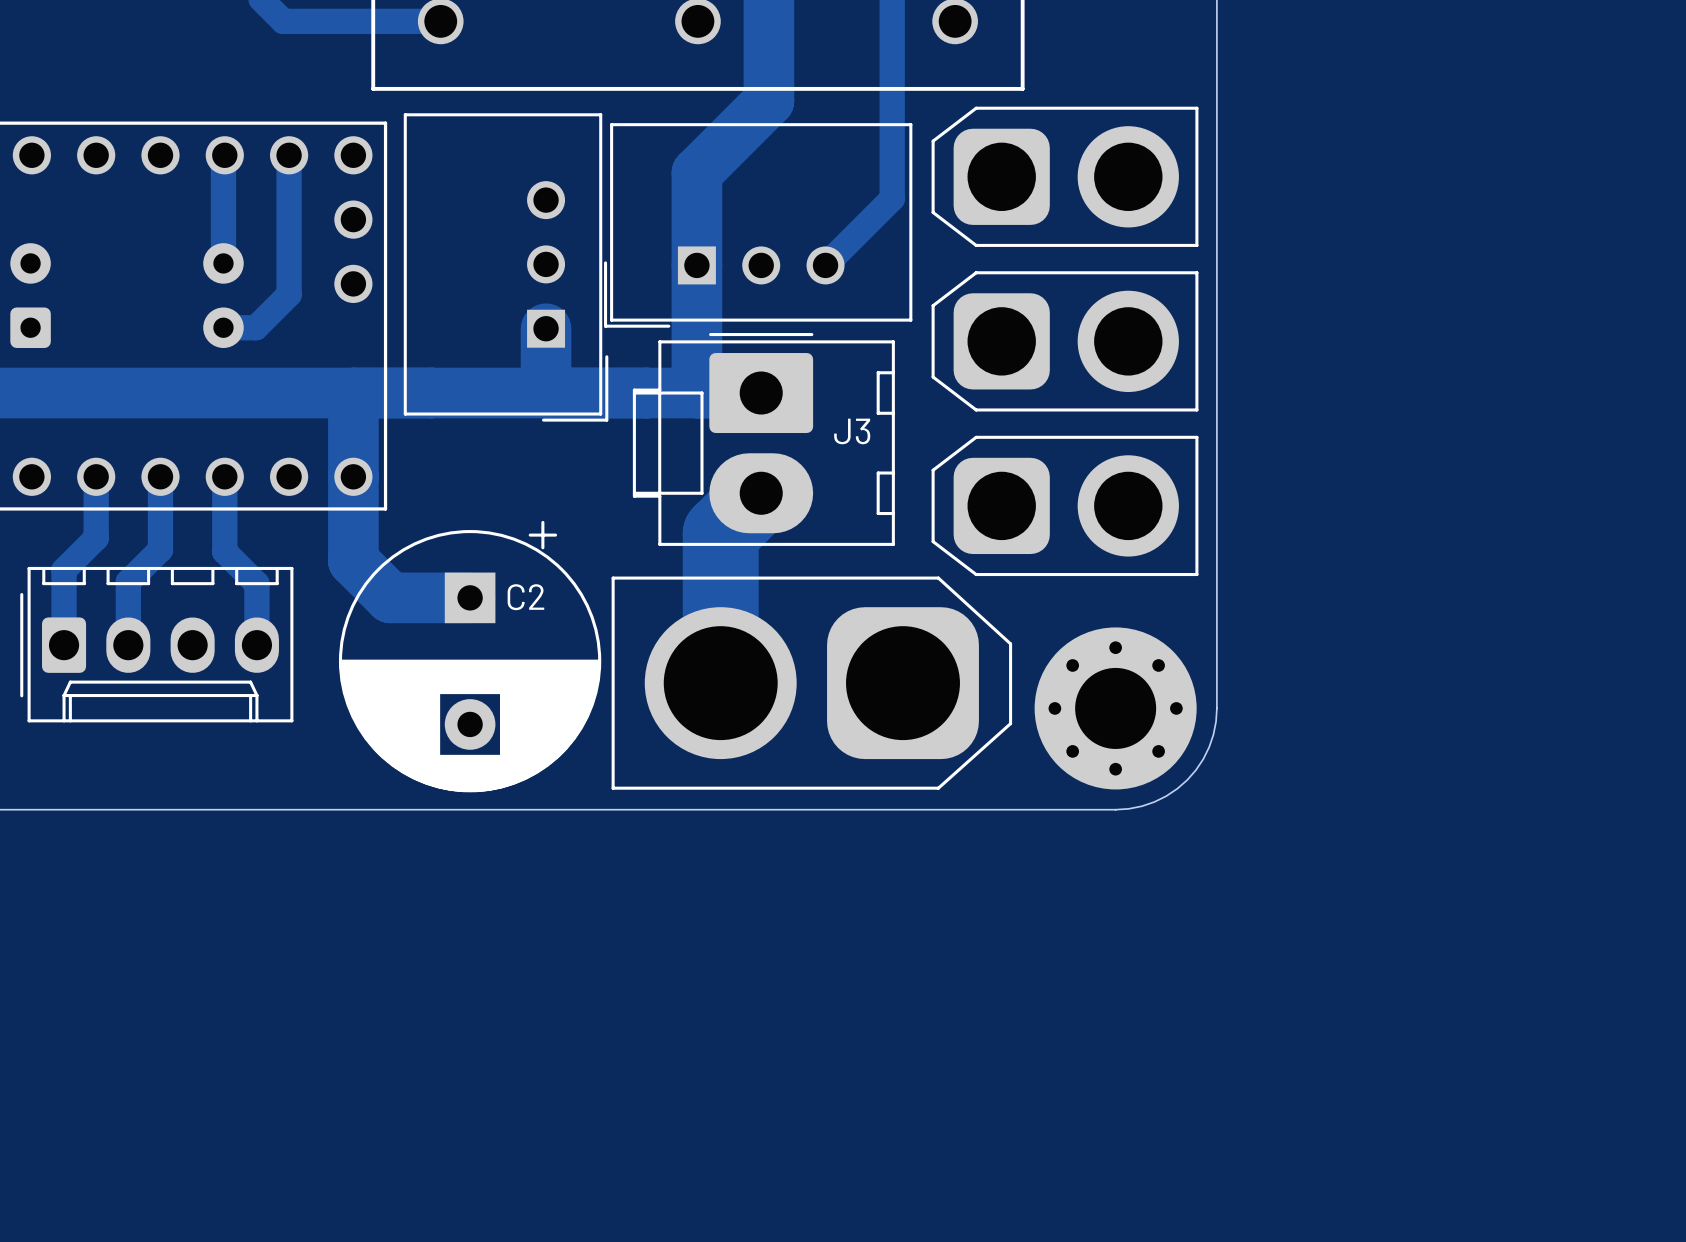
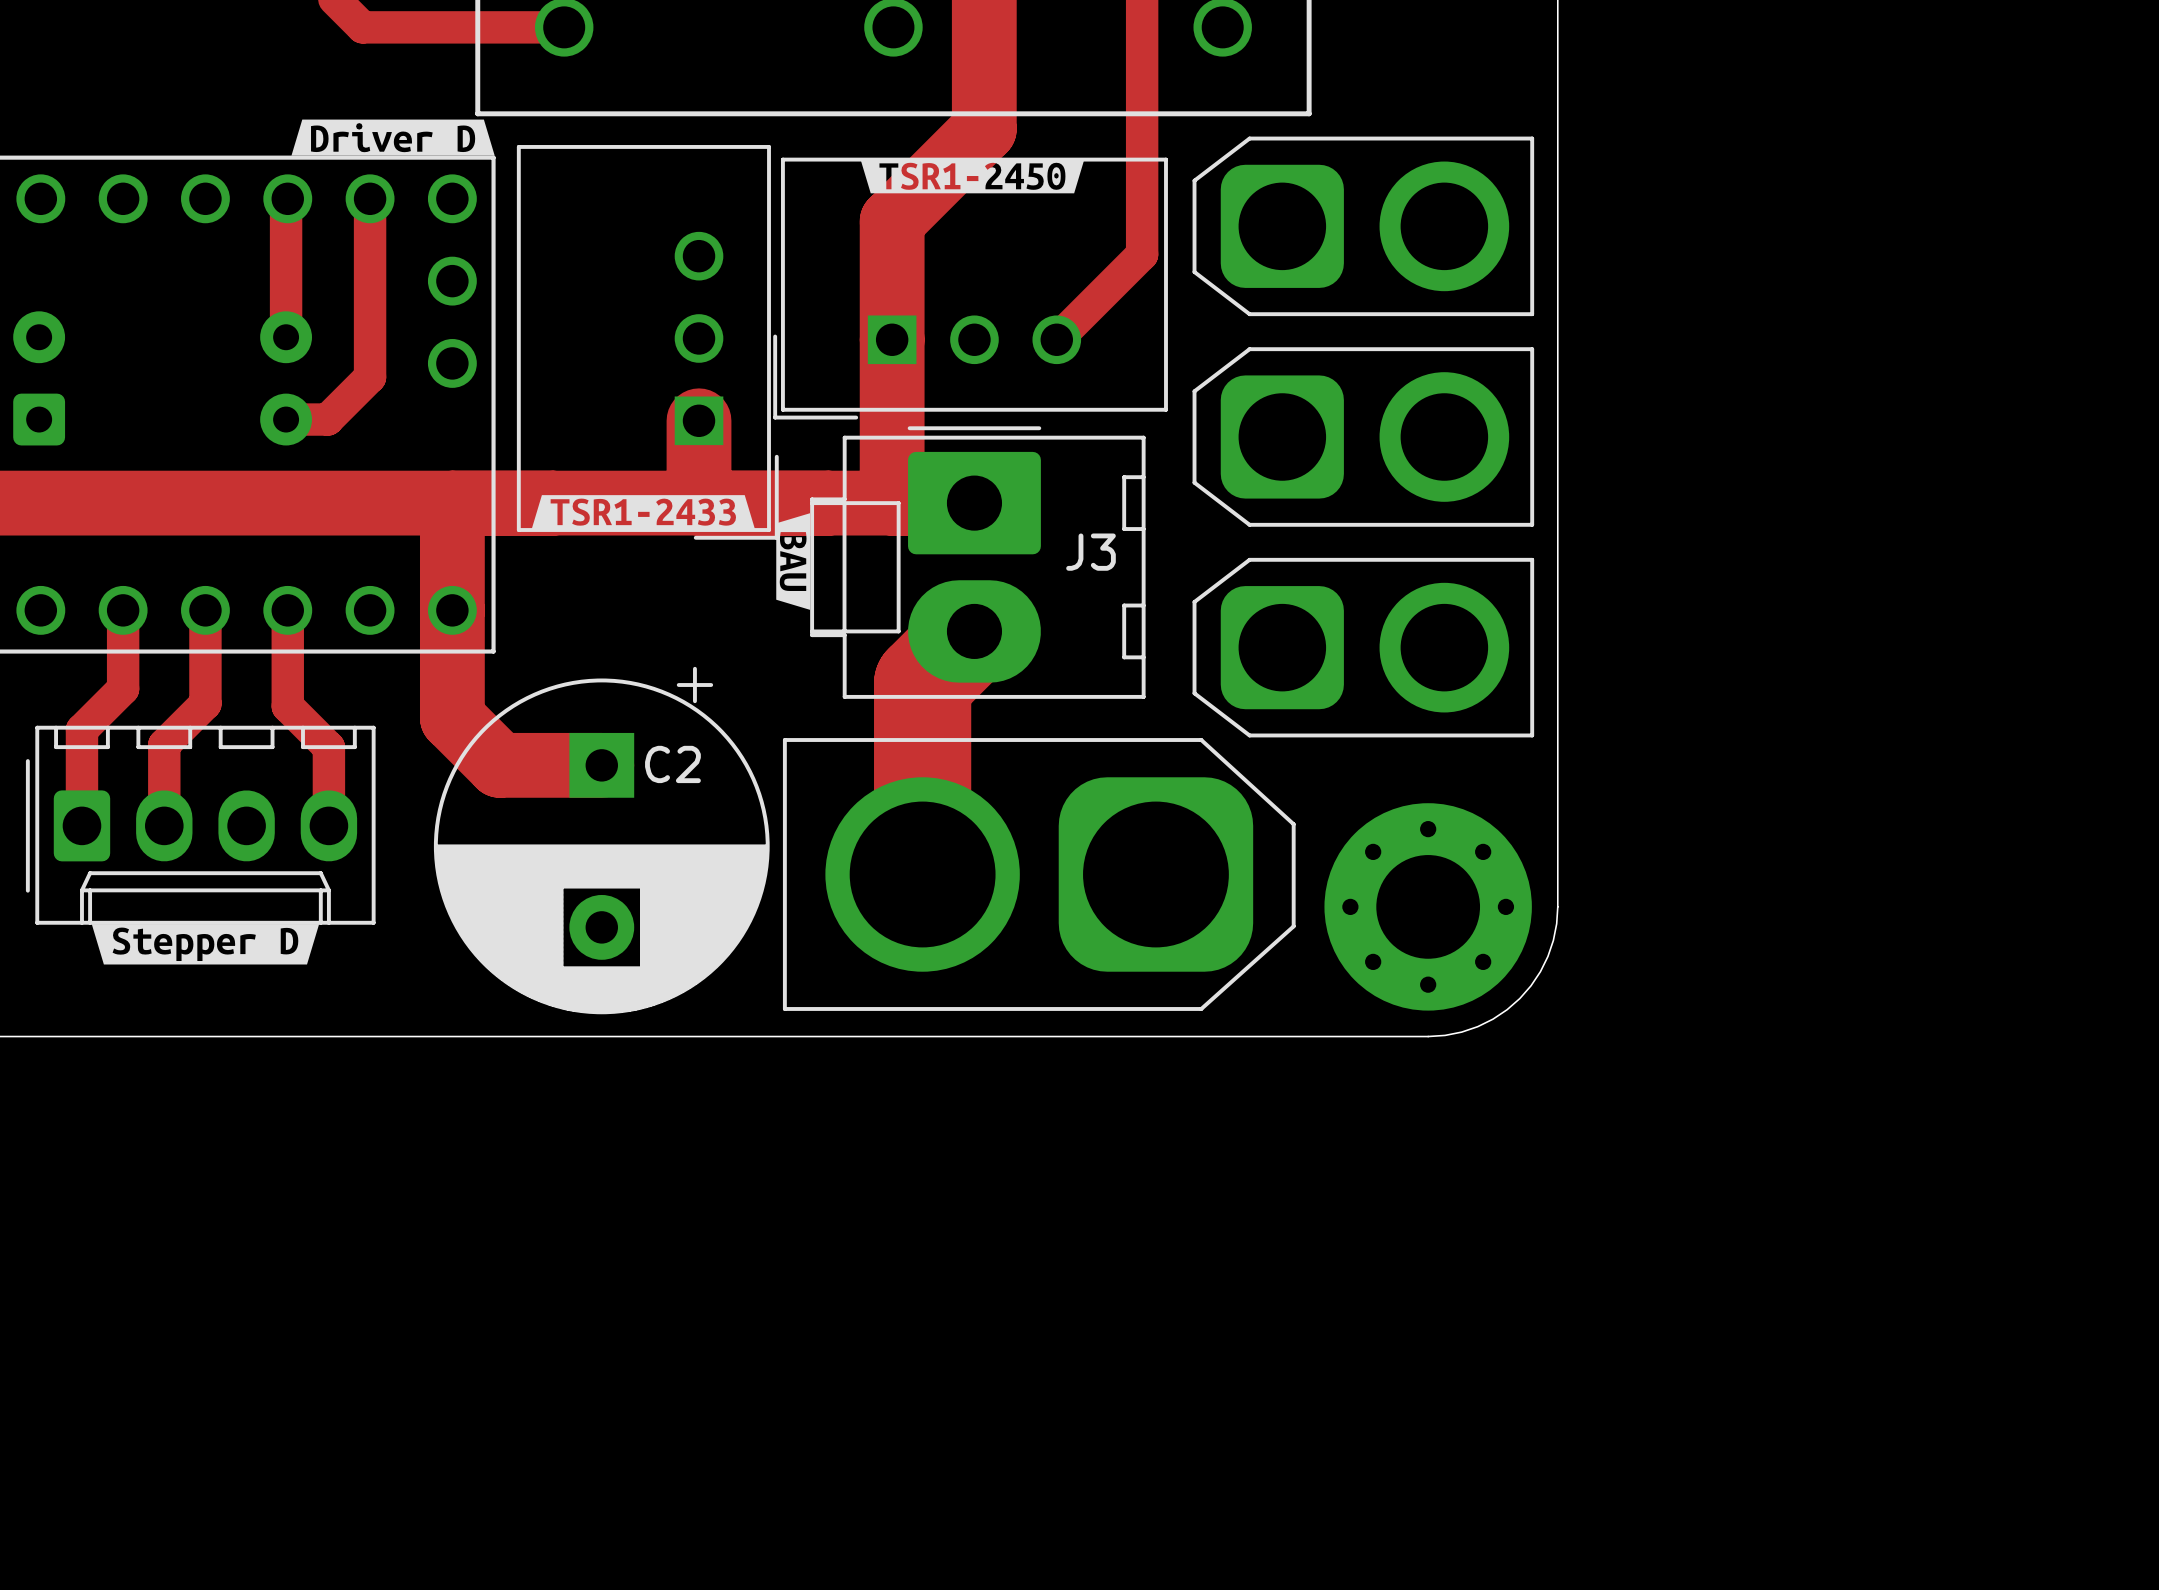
drawing: none -> [291, 119, 495, 156]
drawing: none -> [860, 159, 1085, 194]
drawing: none -> [531, 495, 811, 610]
drawing: none -> [91, 924, 320, 965]

